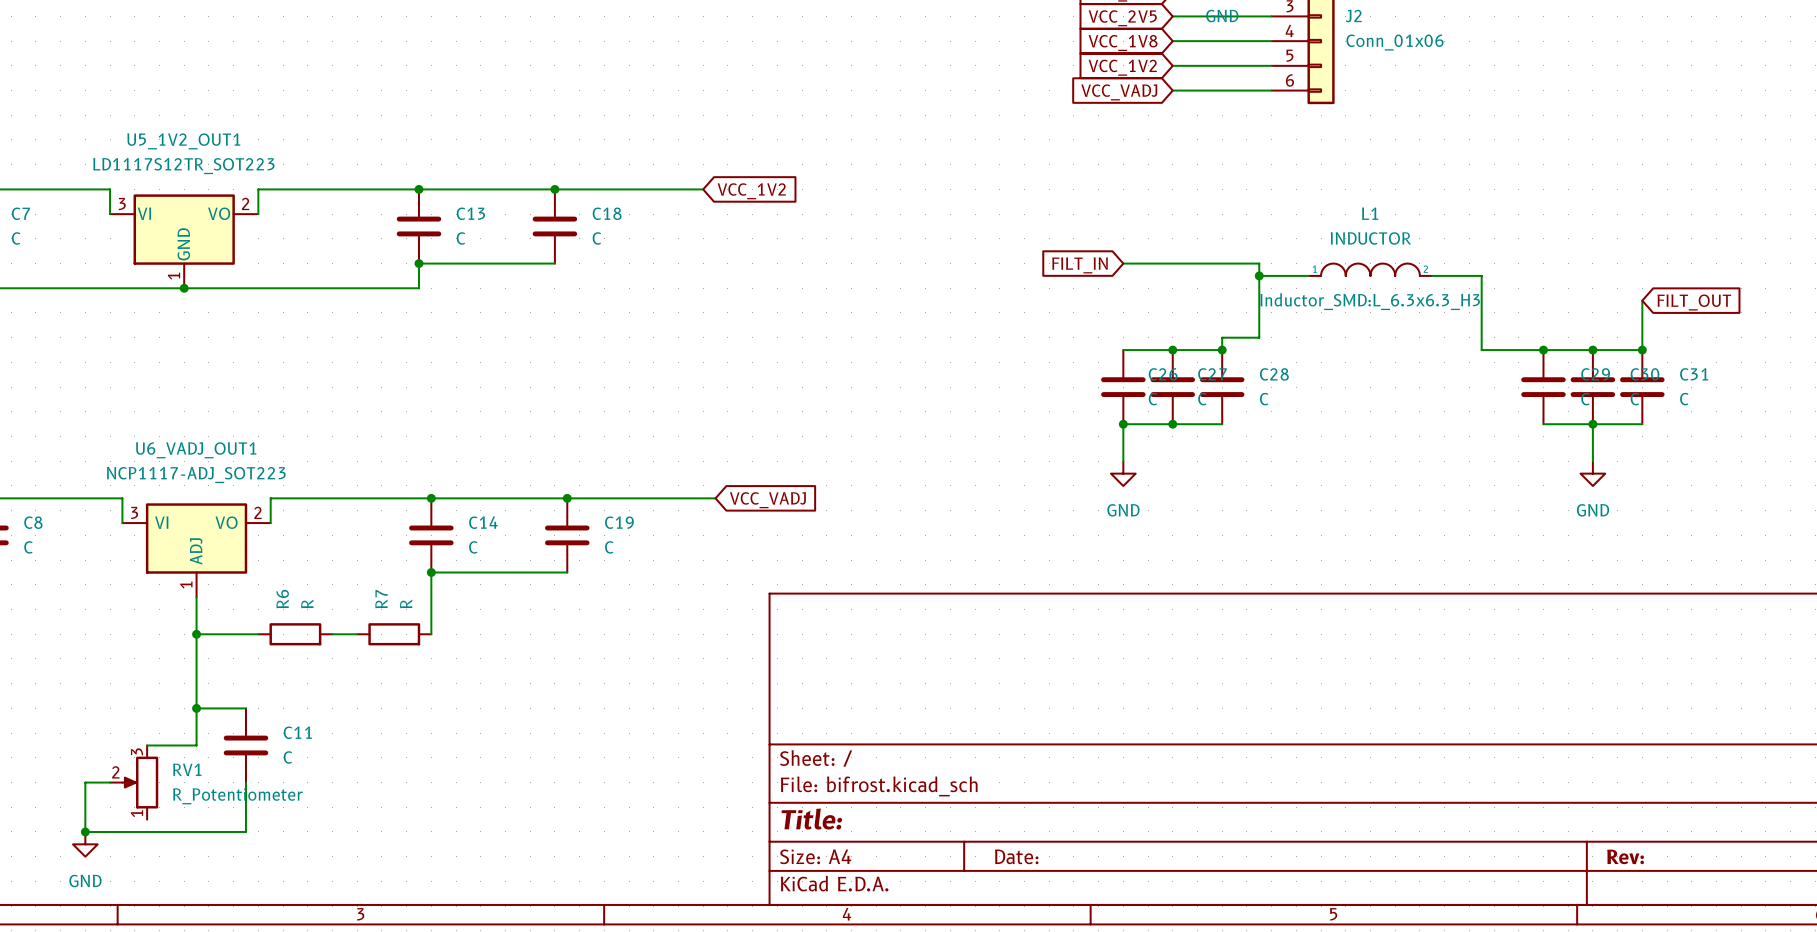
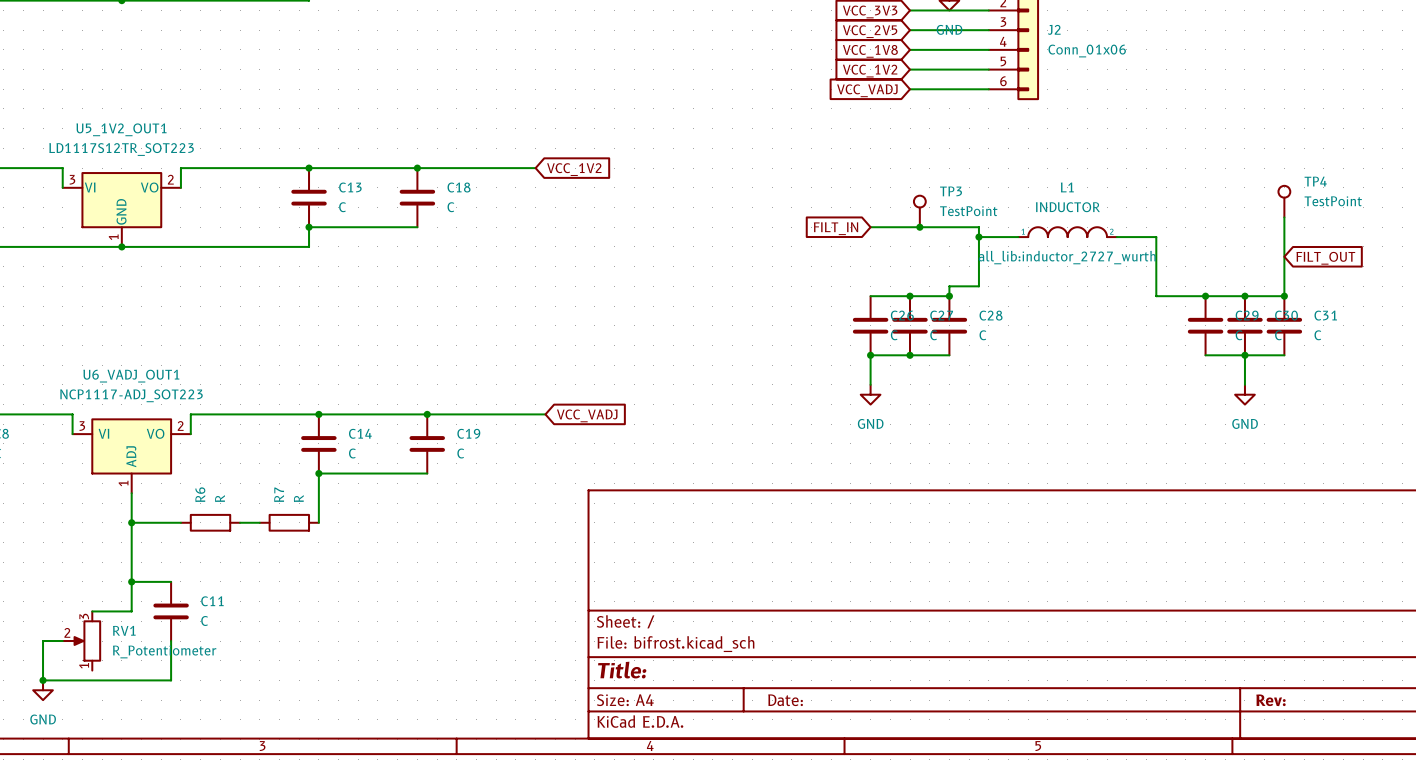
TP4: none -> TestPoint (1284, 201)
TP3: none -> TestPoint (919, 211)
wire: none -> (1284, 217) (1284, 256)
junction: none -> (919, 227)
L1 text: Inductor_SMD:L_6.3x6.3_H3 (1370, 301) -> all_lib:inductor_2727_wurth (1067, 257)

